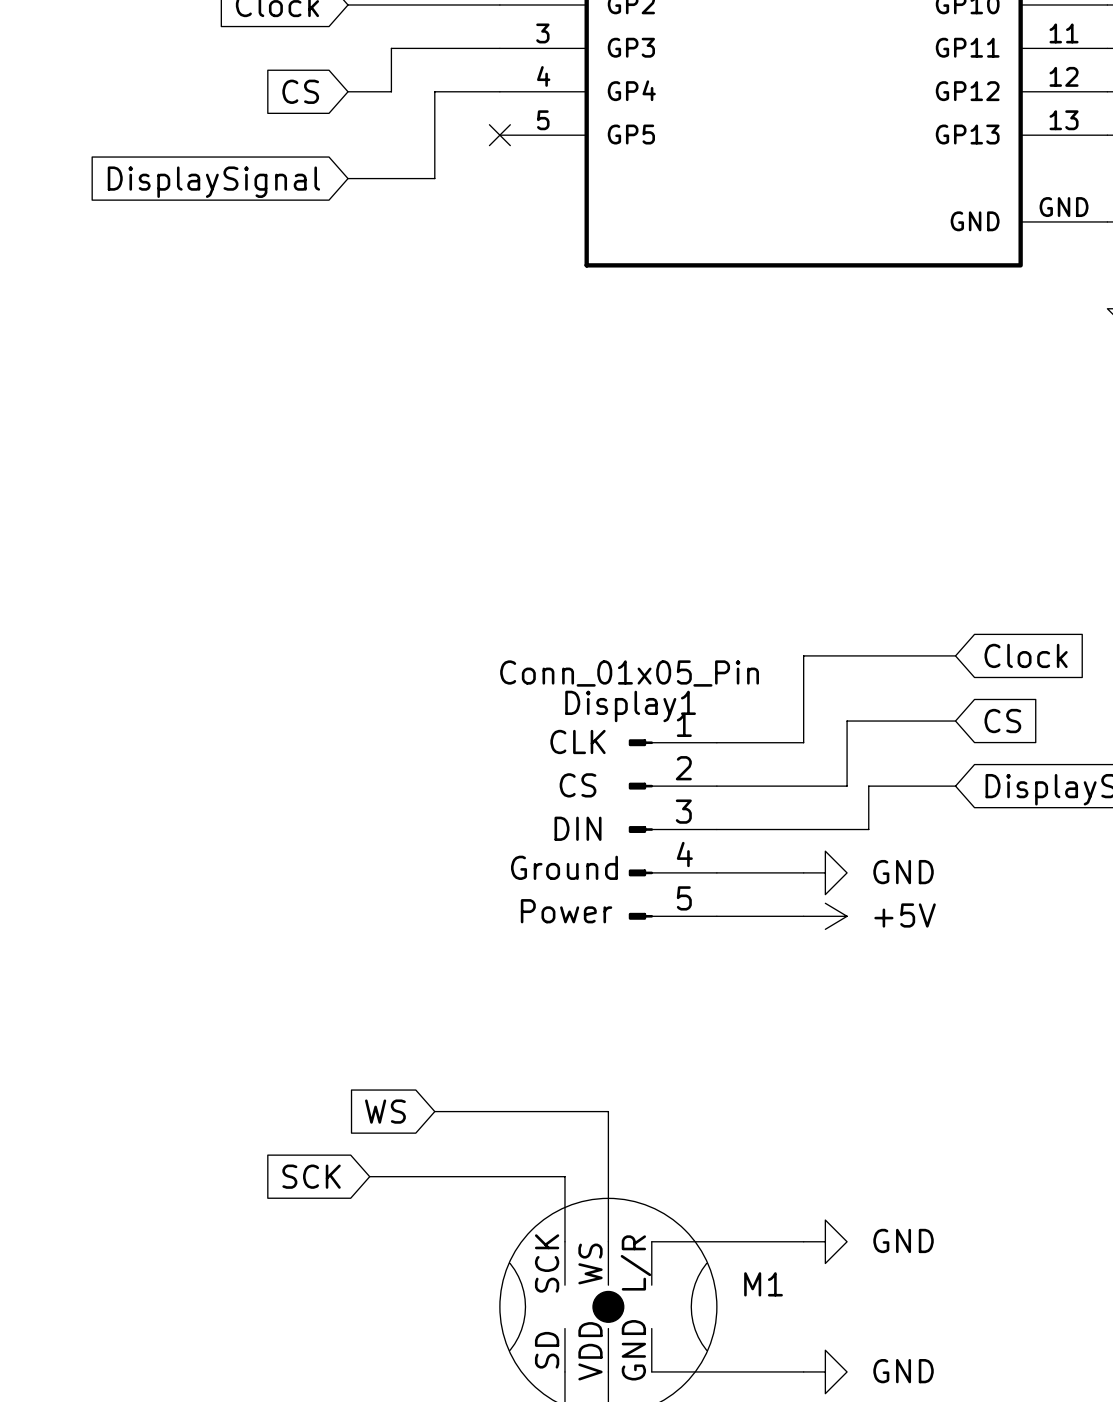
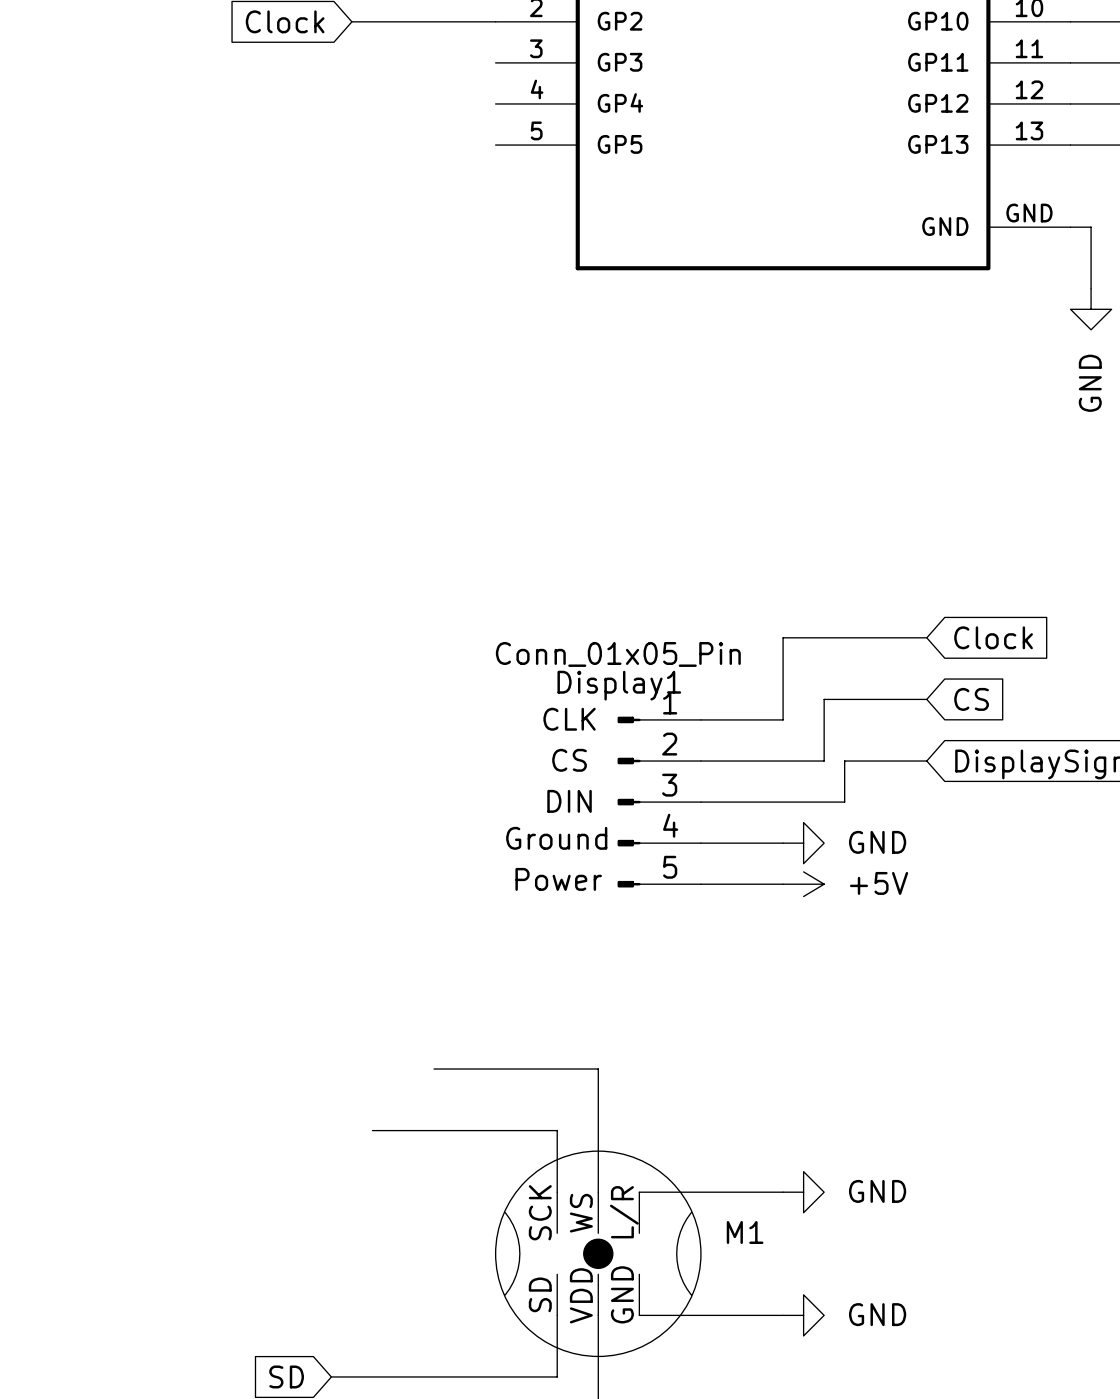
wire: (499, 48) (391, 48) (391, 91) (348, 91) -> none
global label: CS (300, 91) -> none
wire: (499, 91) (434, 91) (434, 178) (348, 178) -> none
no-connect mark: (499, 135) -> none
global label: DisplaySignal (213, 182) -> none
global label: WS (385, 1111) -> none
global label: SCK (311, 1176) -> none

